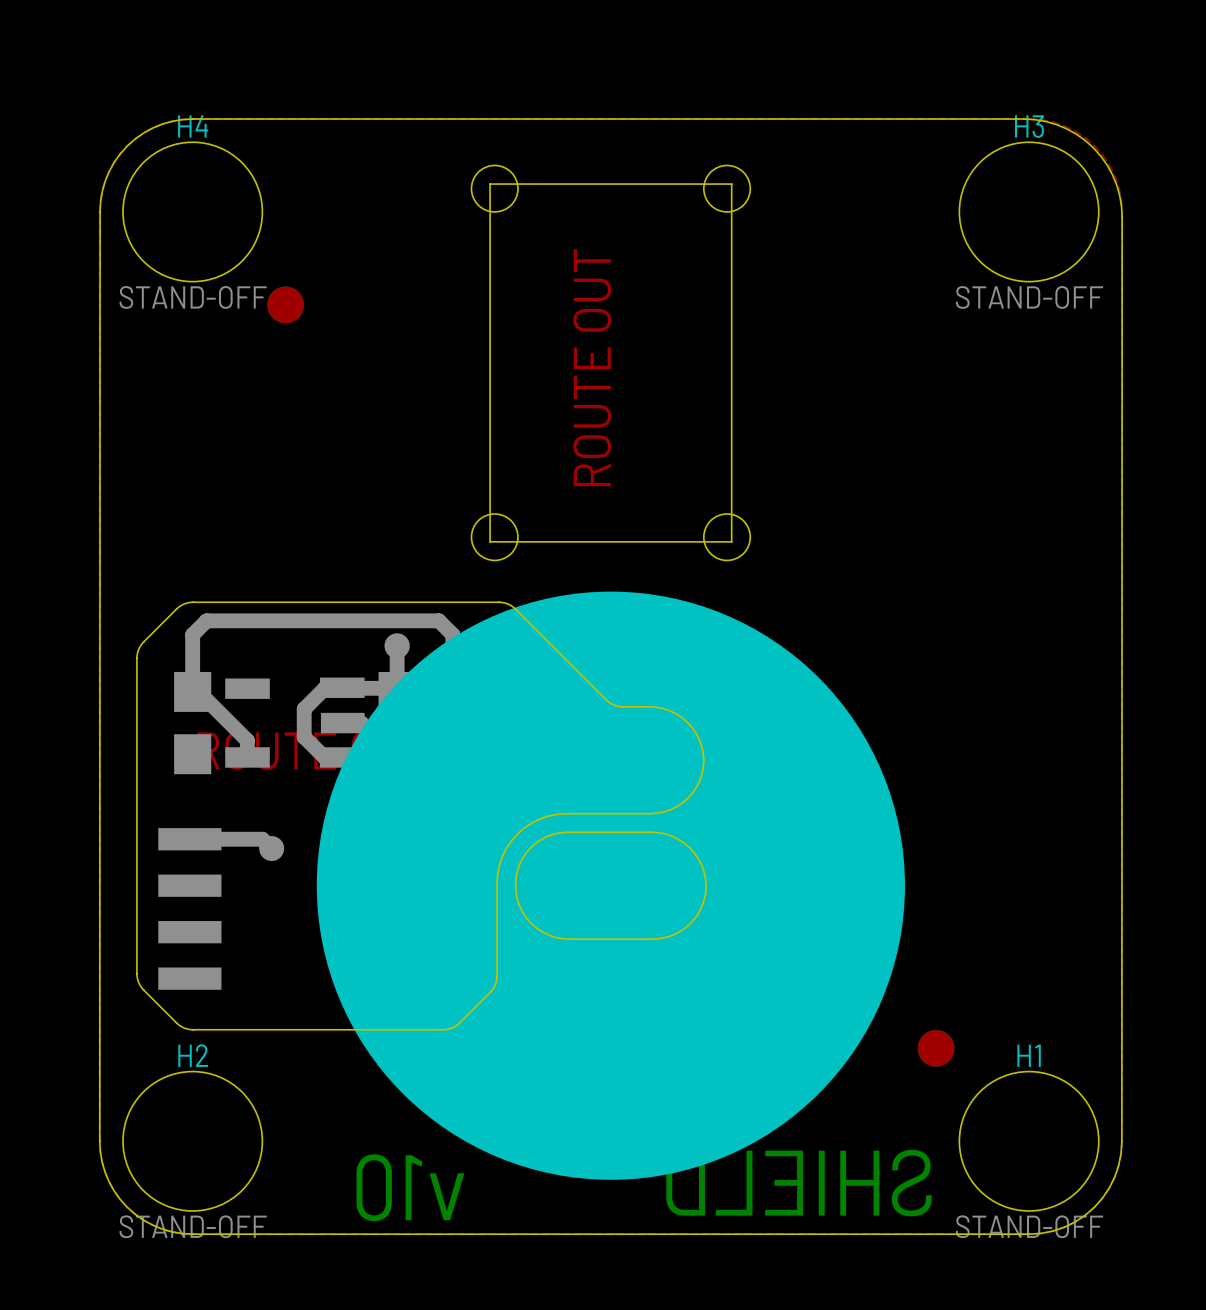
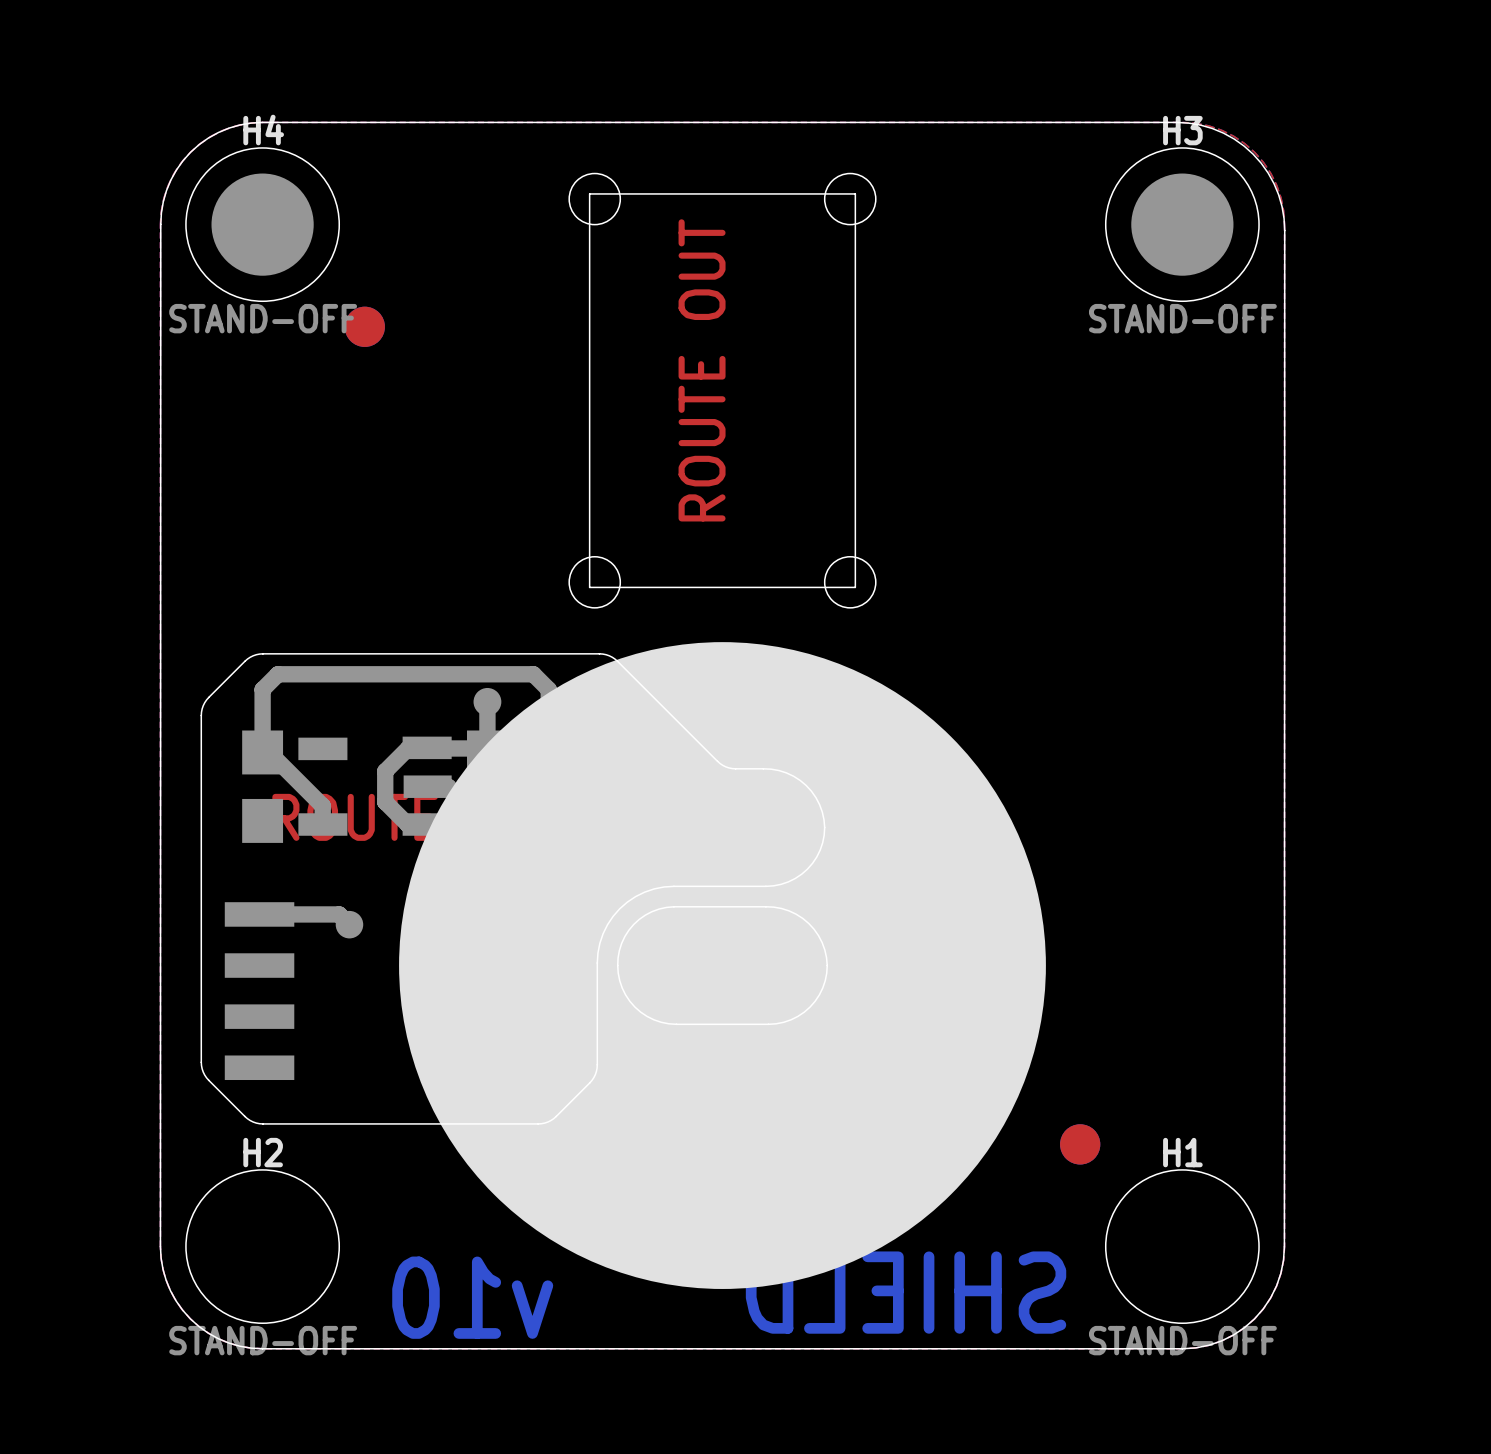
drawing: none -> [211, 173, 314, 276]
drawing: none -> [1131, 173, 1234, 276]

